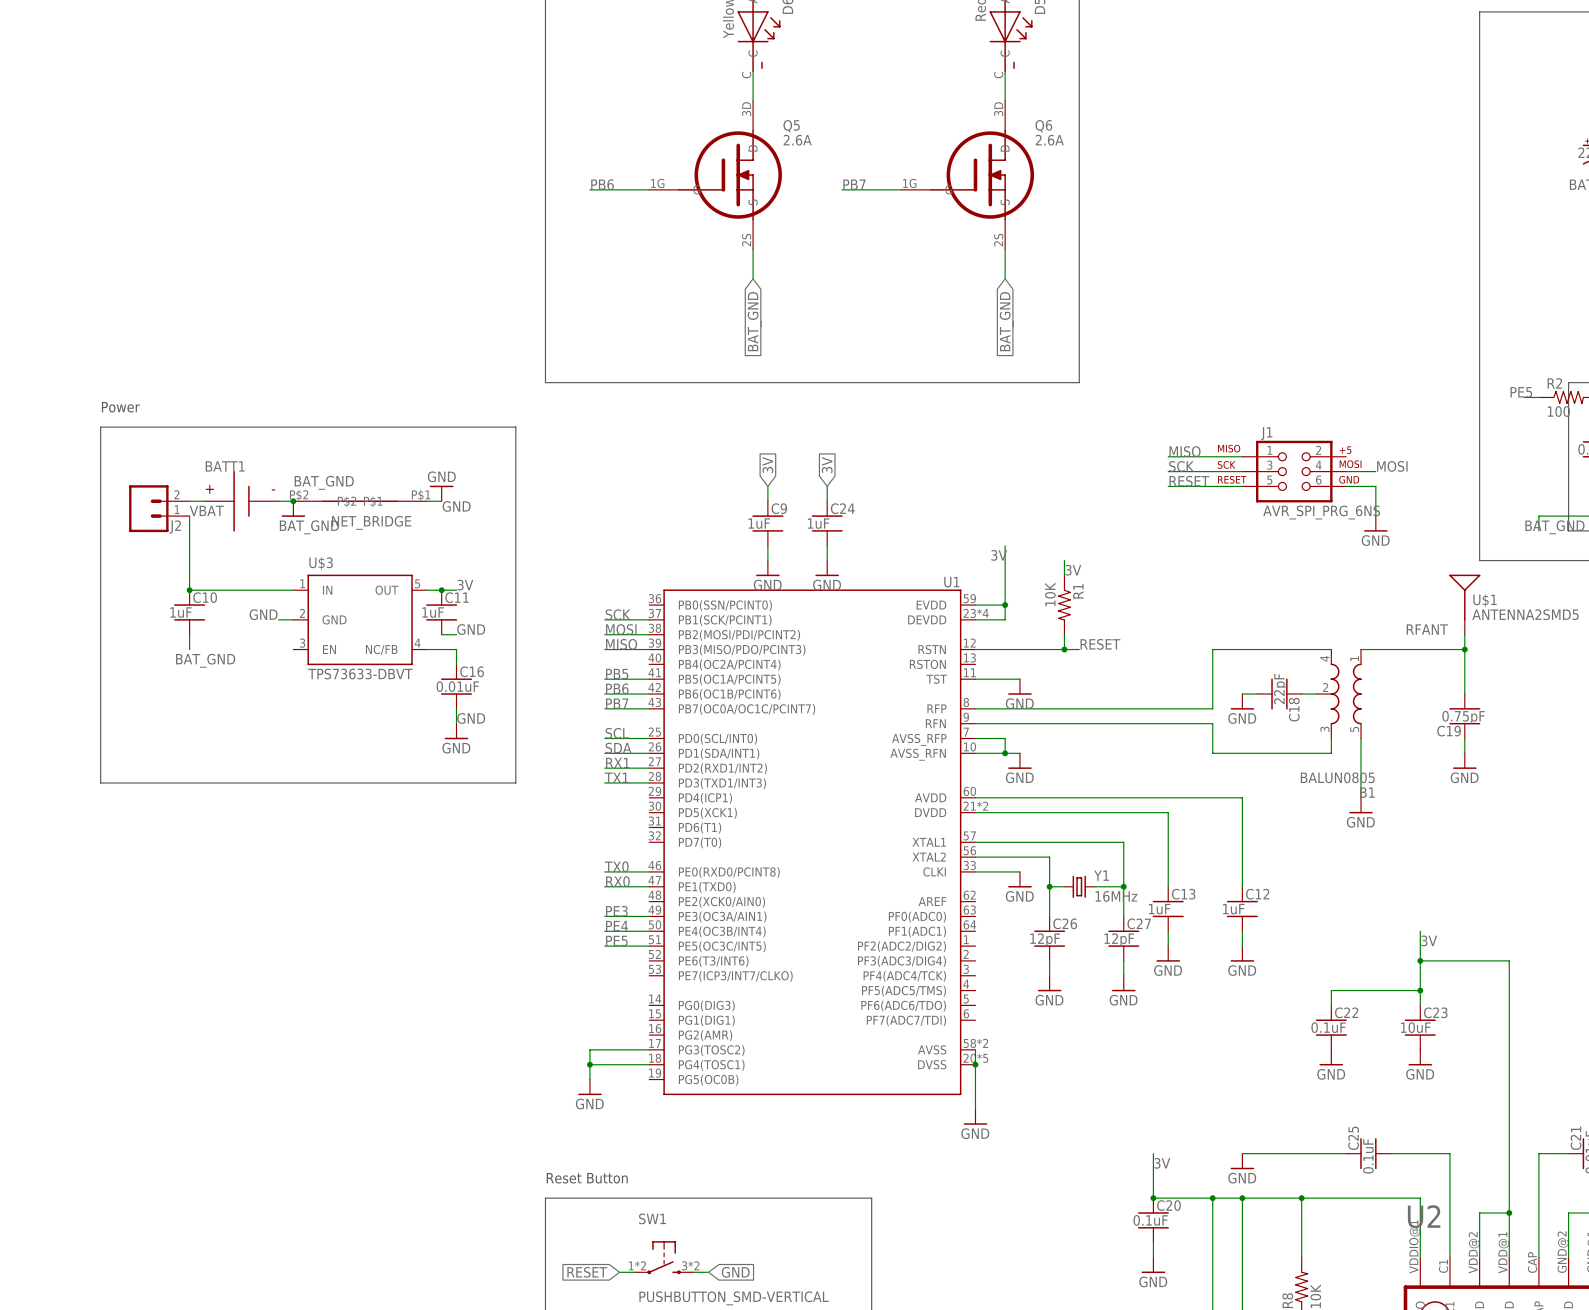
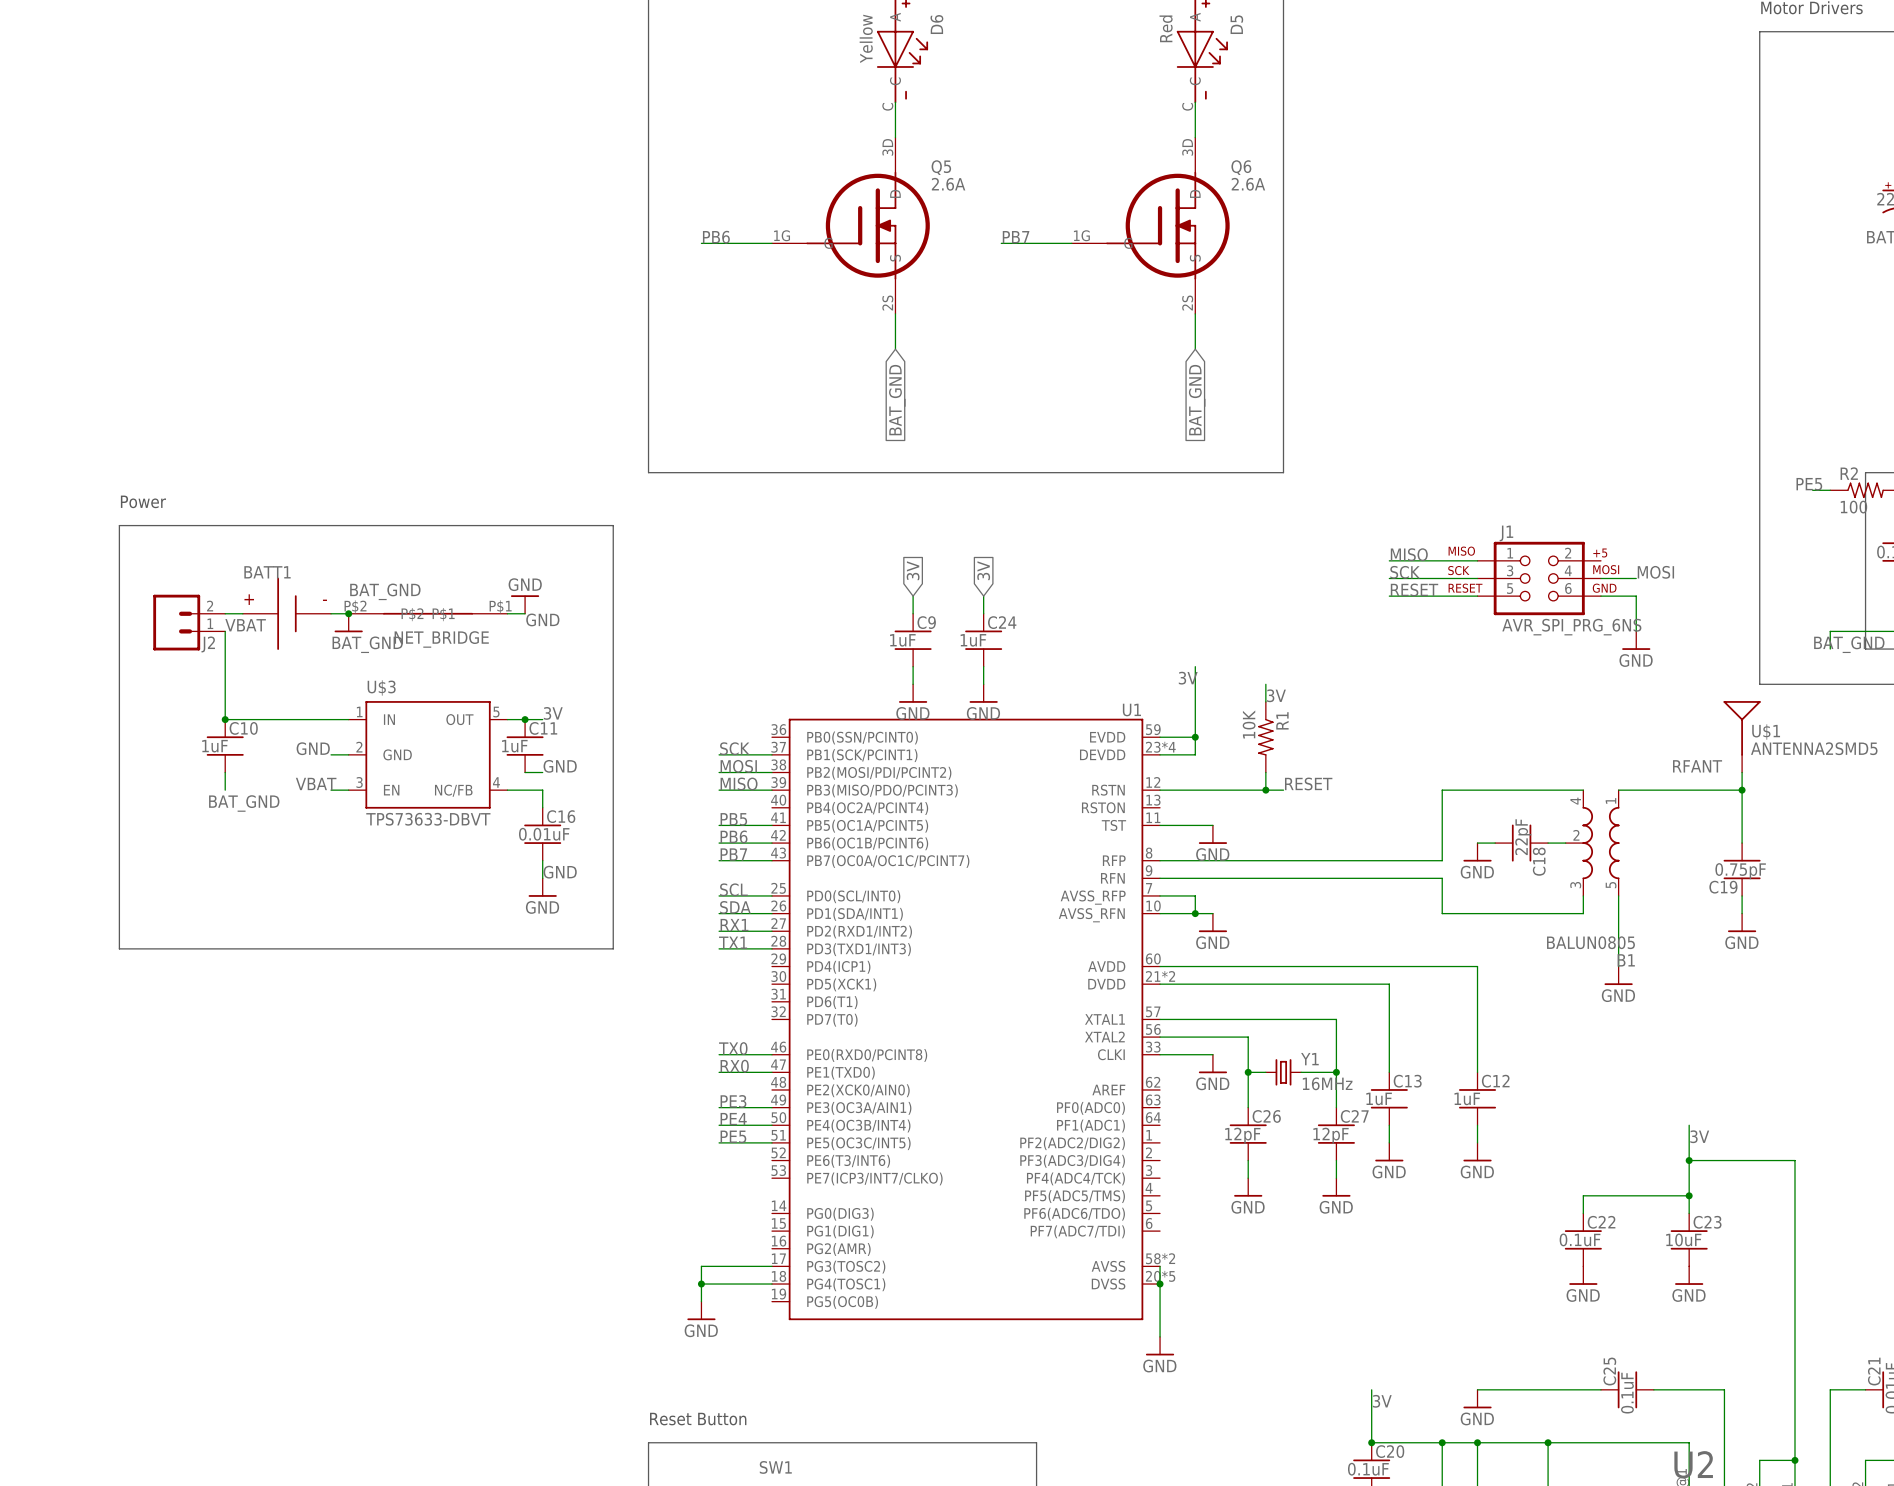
label: none -> VBAT (316, 783)
wire: none -> (331, 790) (348, 790)

